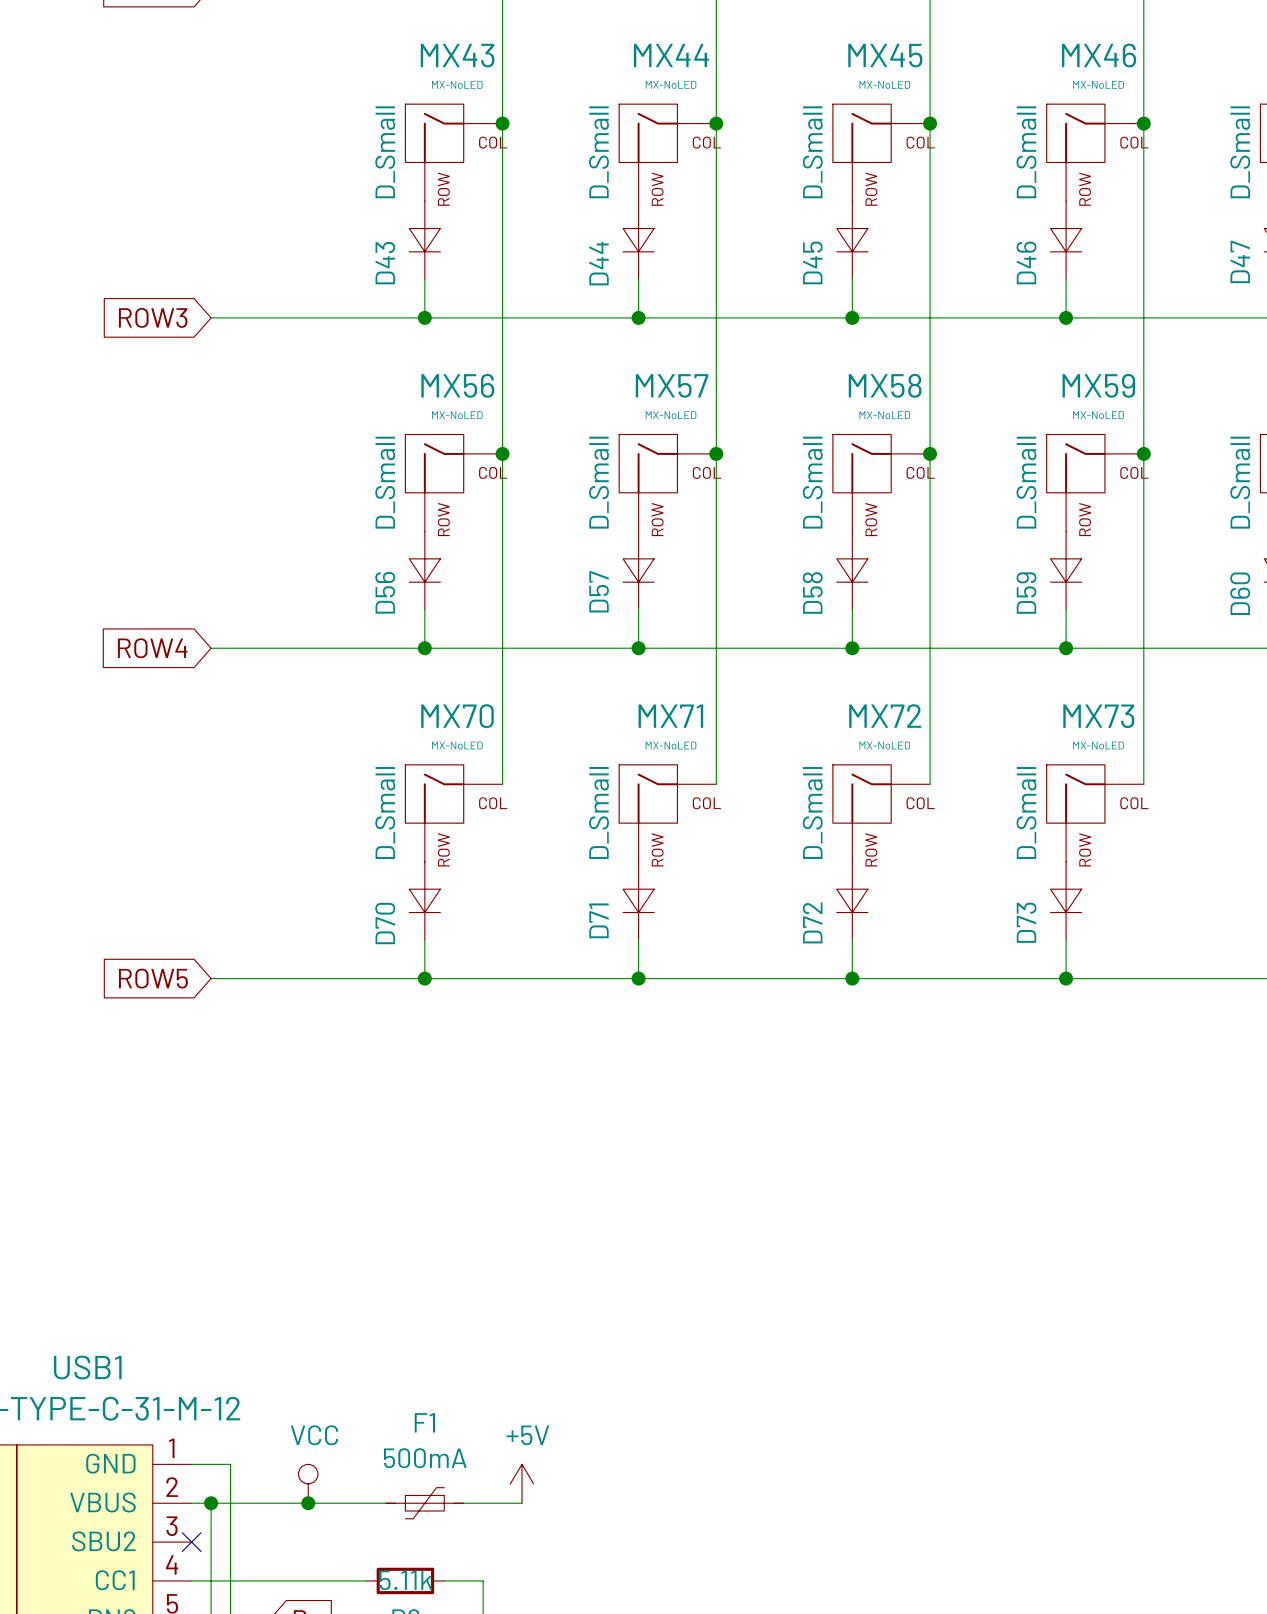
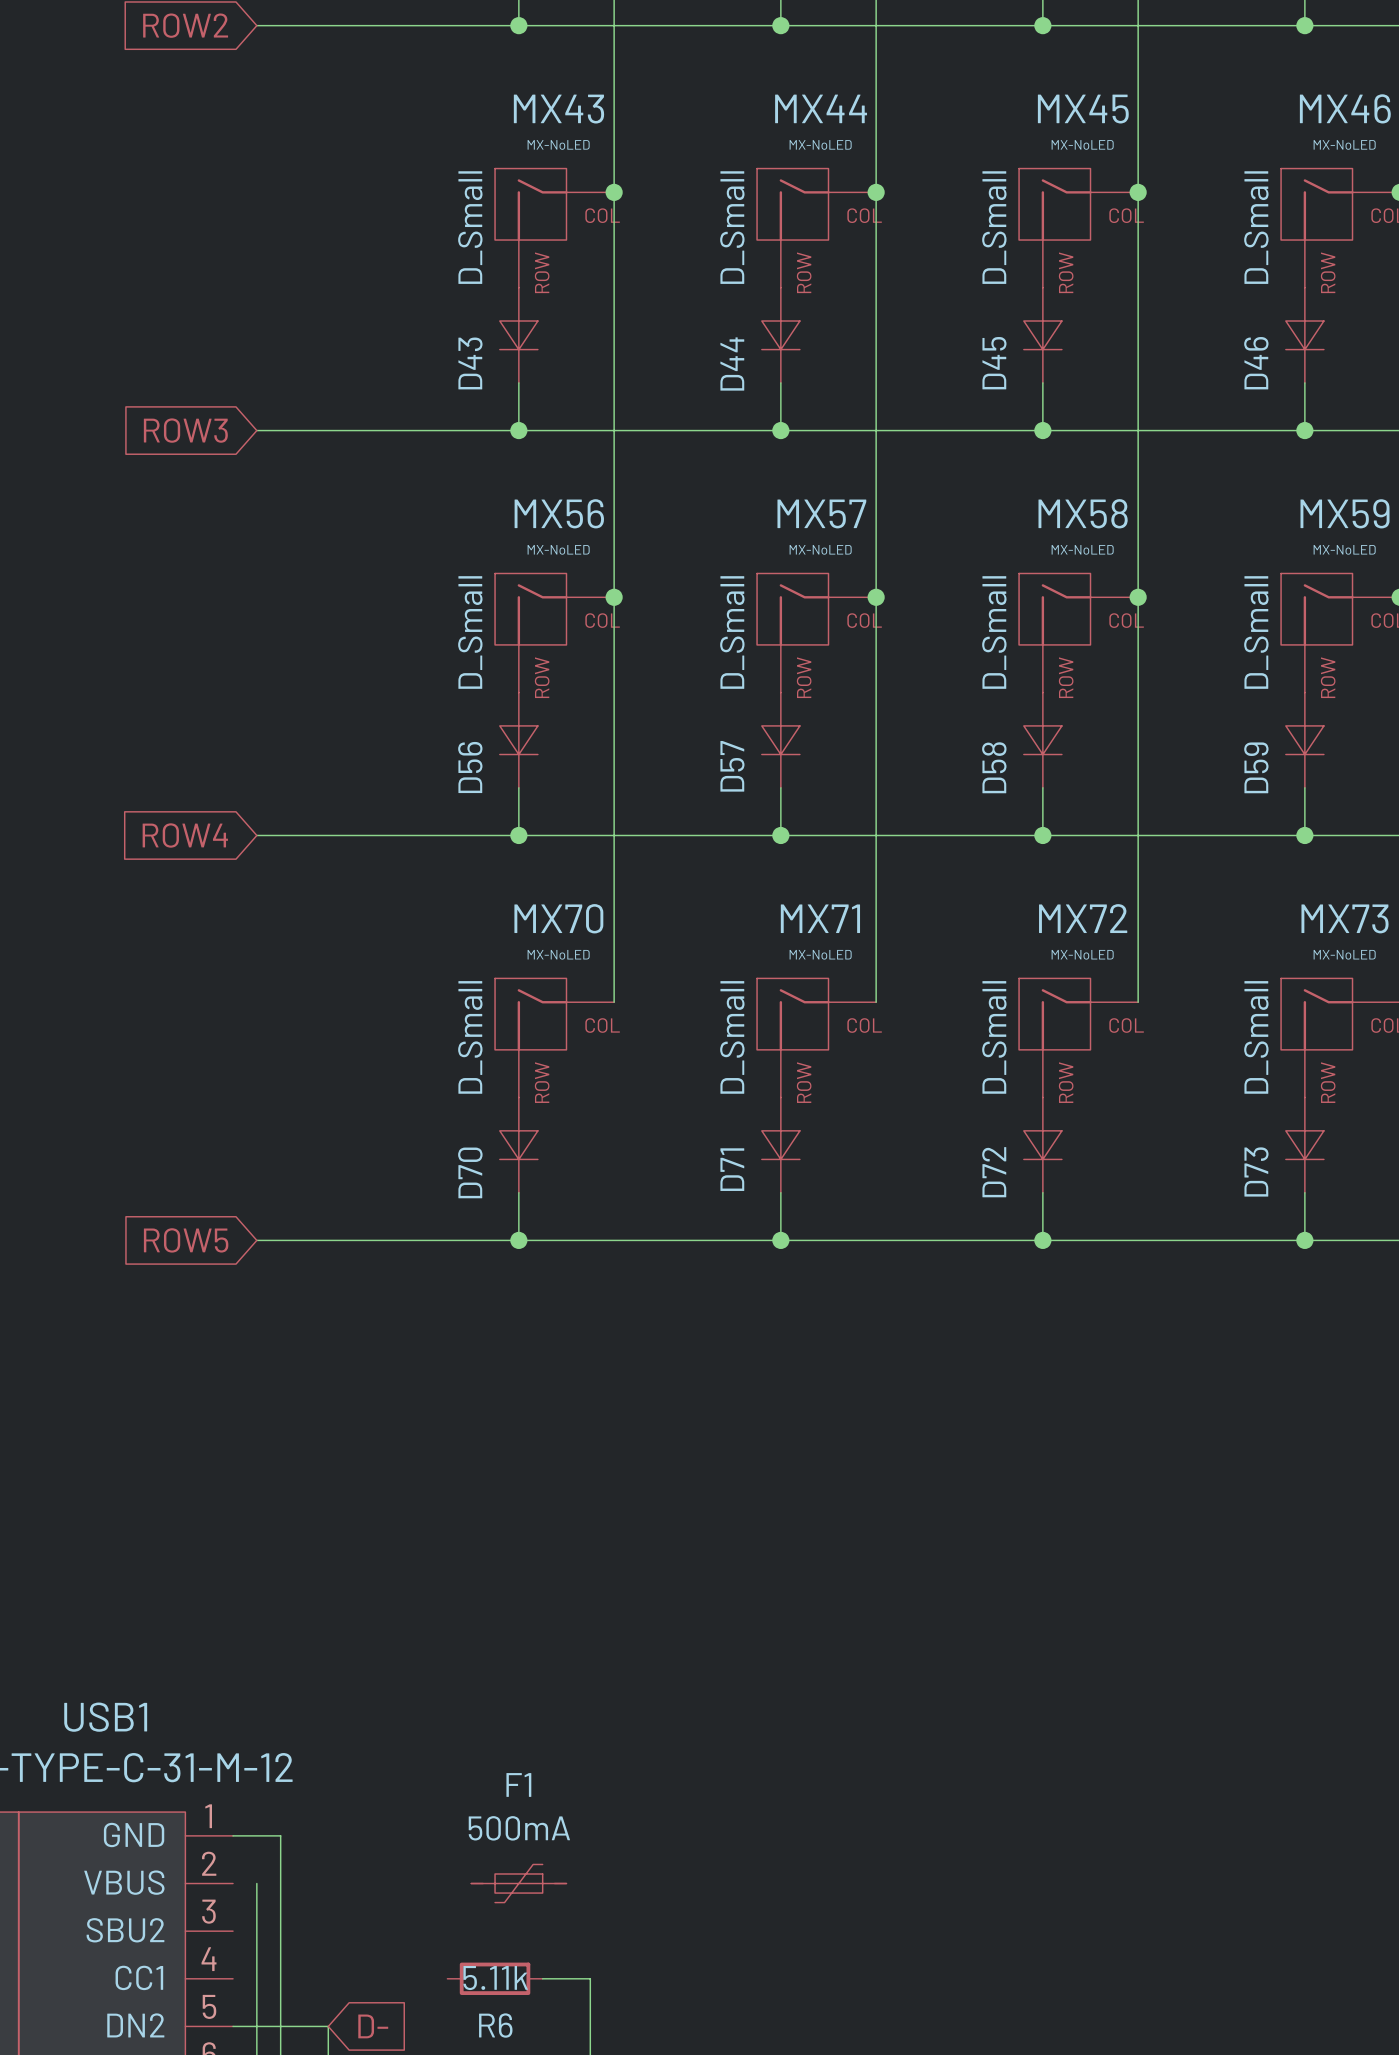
power symbol: VCC (308, 1483) -> none
power symbol: +5V (521, 1483) -> none
wire: (191, 1503) (385, 1503) -> none
junction: (211, 1503) -> none
junction: (308, 1503) -> none
wire: (463, 1503) (521, 1503) -> none
no-connect mark: (191, 1542) -> none
wire: (191, 1580) (366, 1580) -> none

